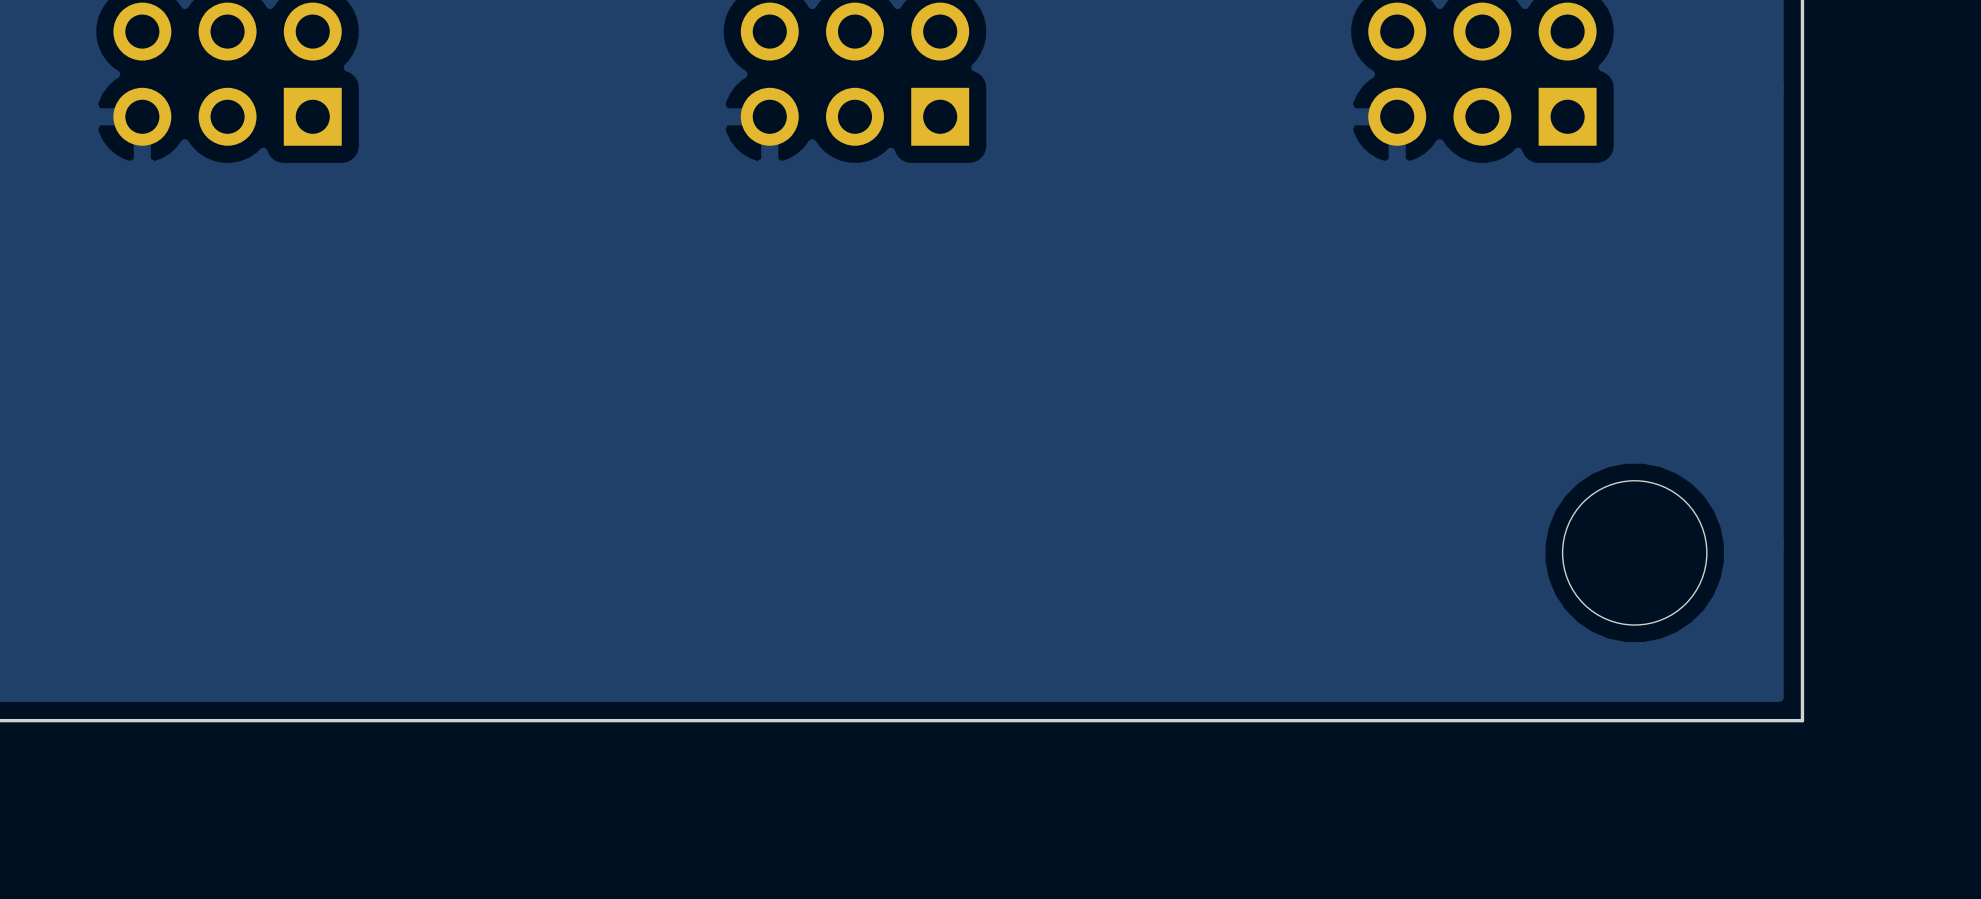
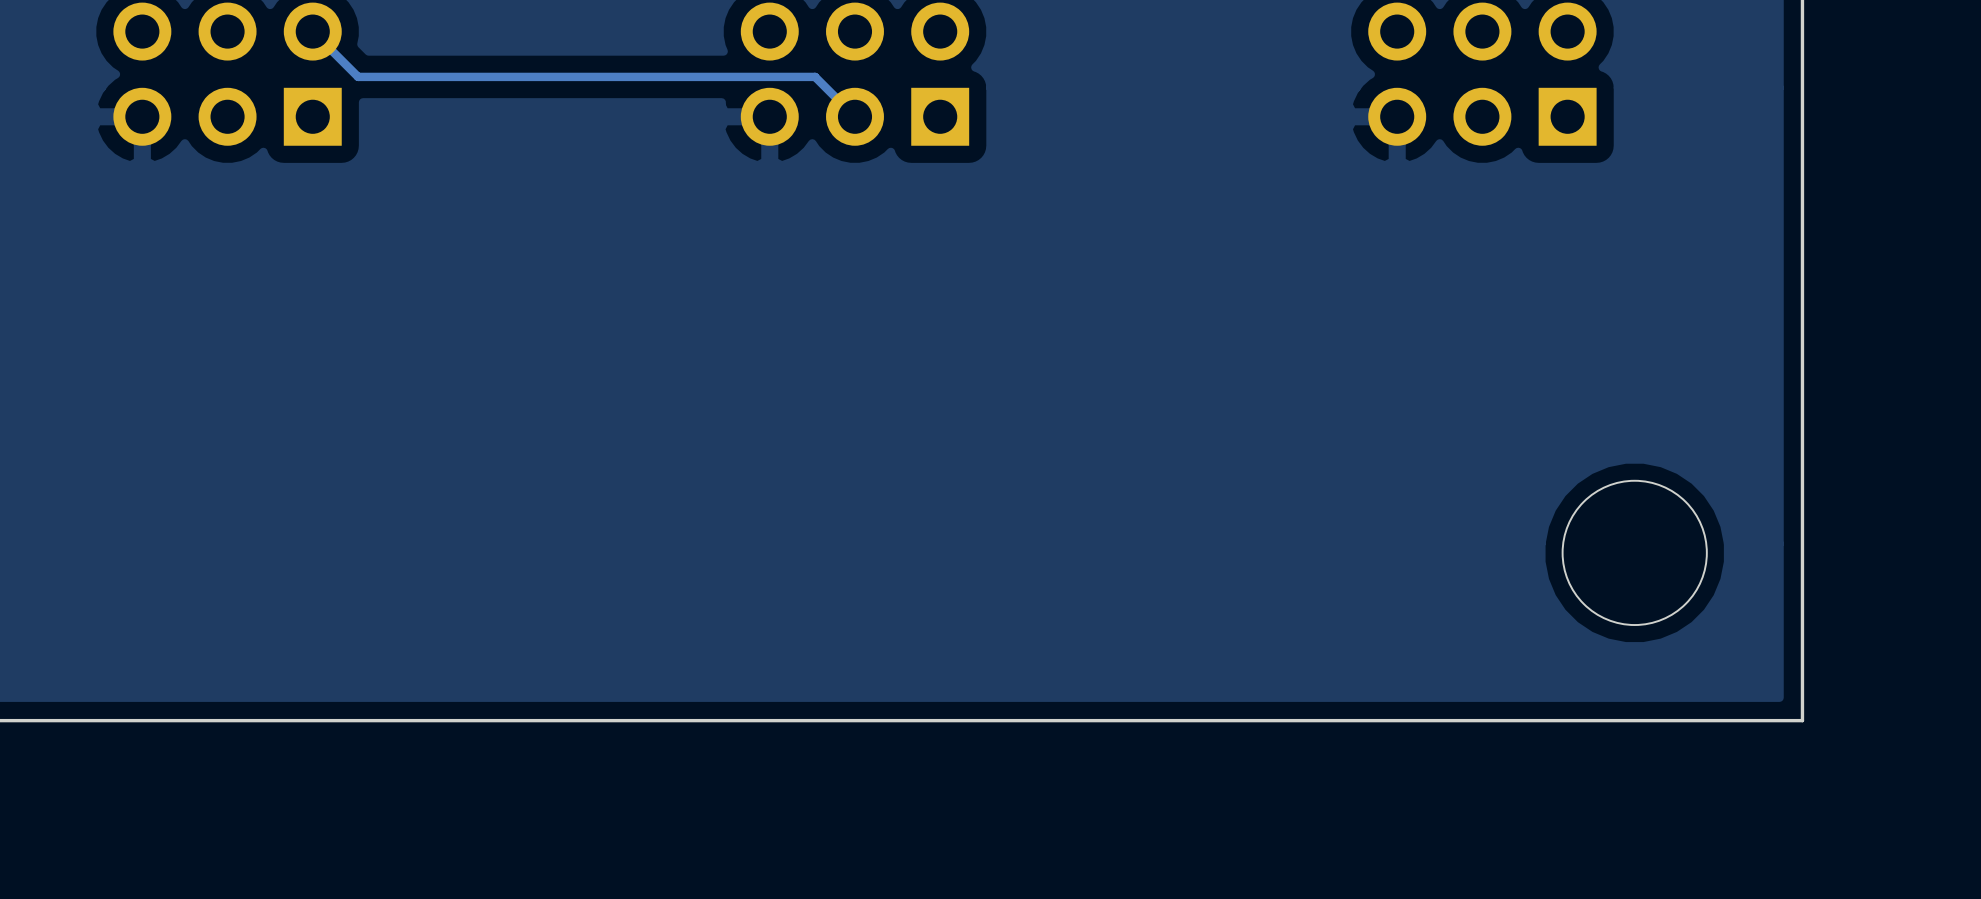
track: none -> (312, 31) (358, 76) (815, 76) (854, 116)

